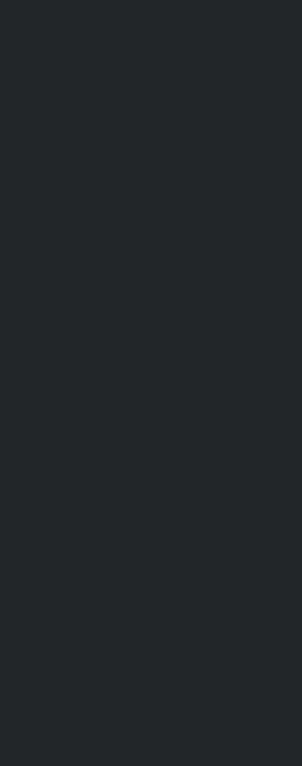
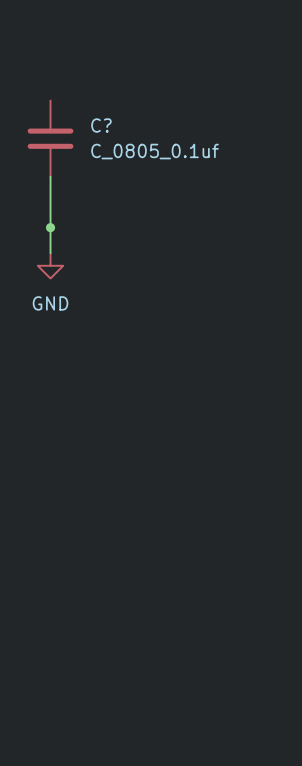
C?: none -> C_0805_0.1uf (50, 138)
wire: none -> (50, 176) (50, 253)
junction: none -> (50, 227)
power symbol: none -> GND (50, 265)

